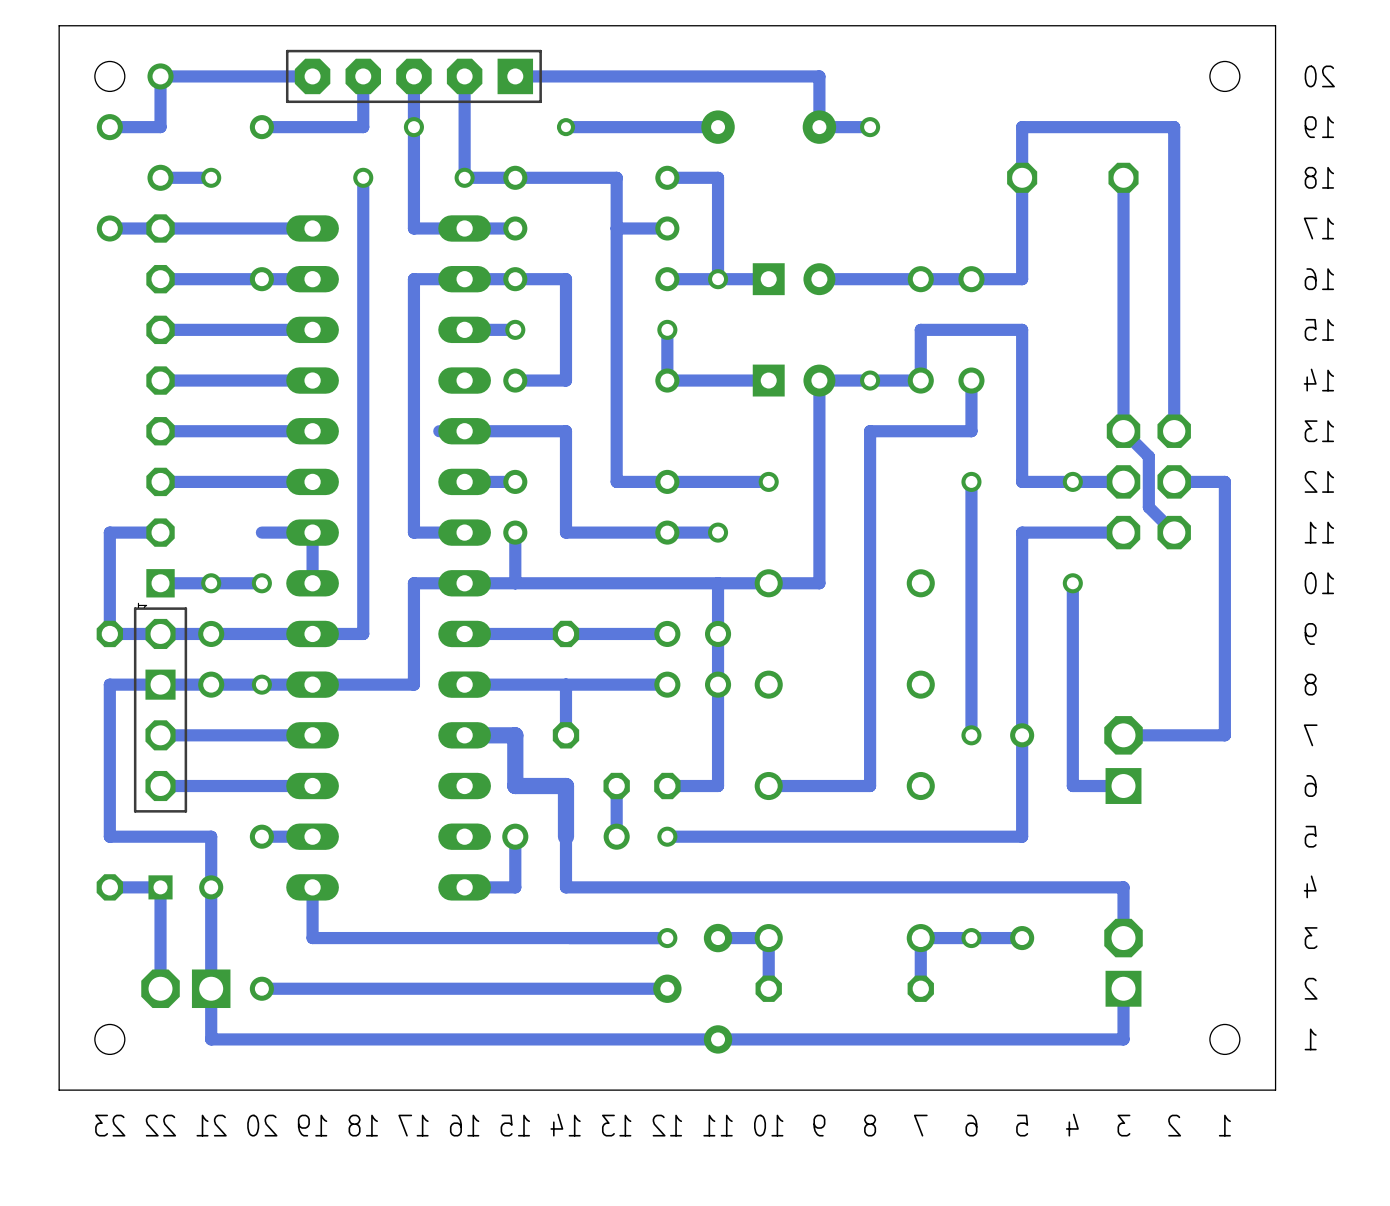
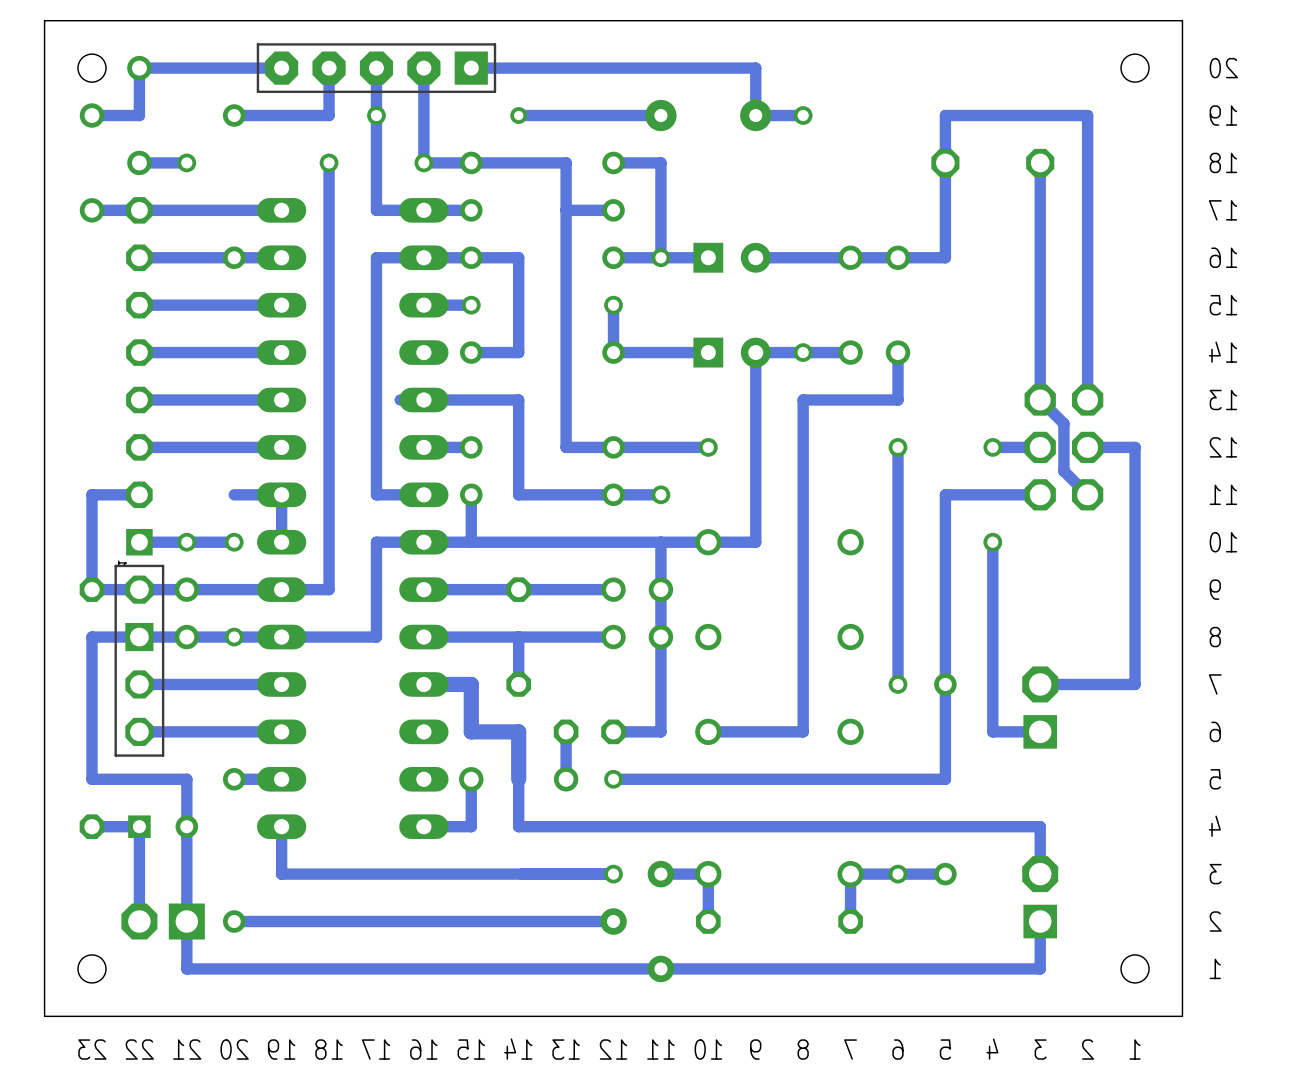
track: (920, 380) (920, 329) (1022, 329) (1022, 481) (1072, 481) -> none

